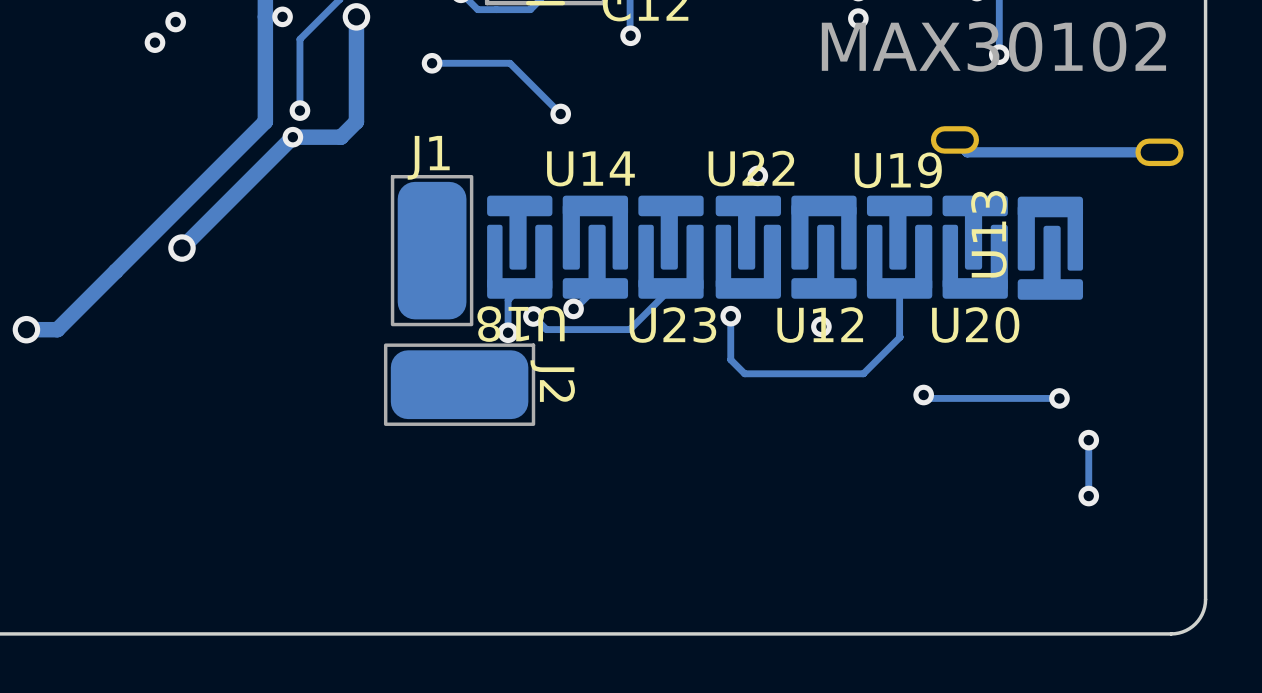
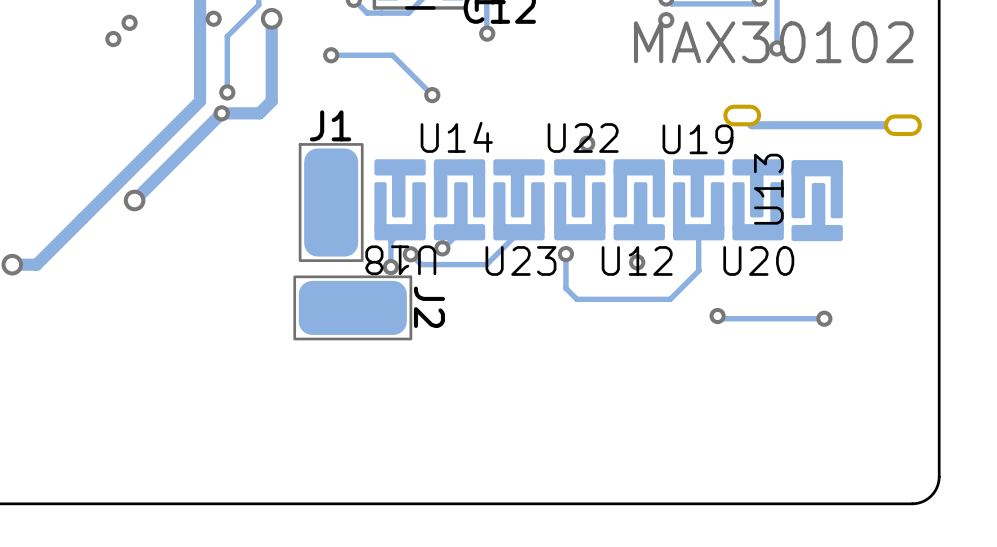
track: (1088, 440) (1088, 496) -> none
via: (1088, 440) -> none
via: (1088, 496) -> none

